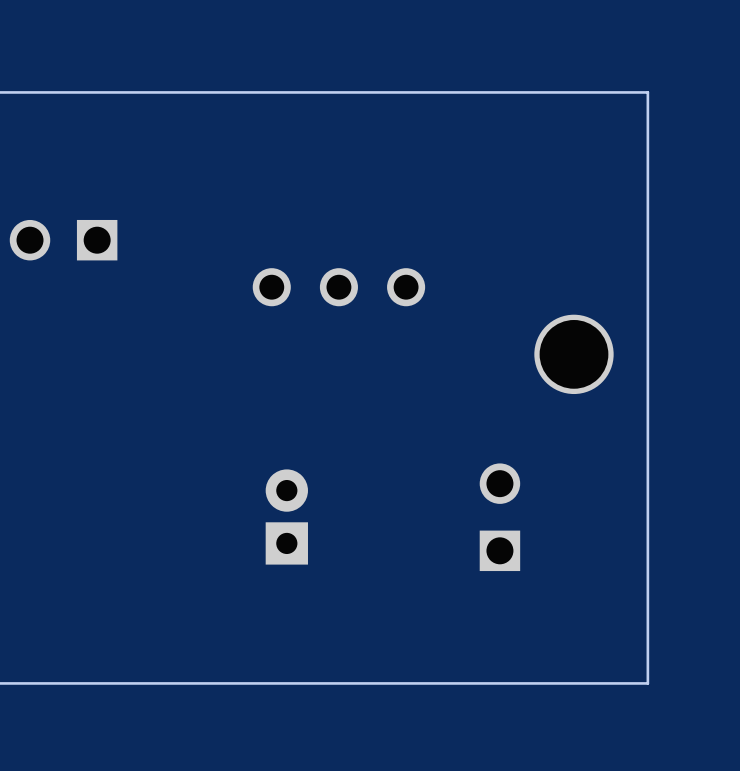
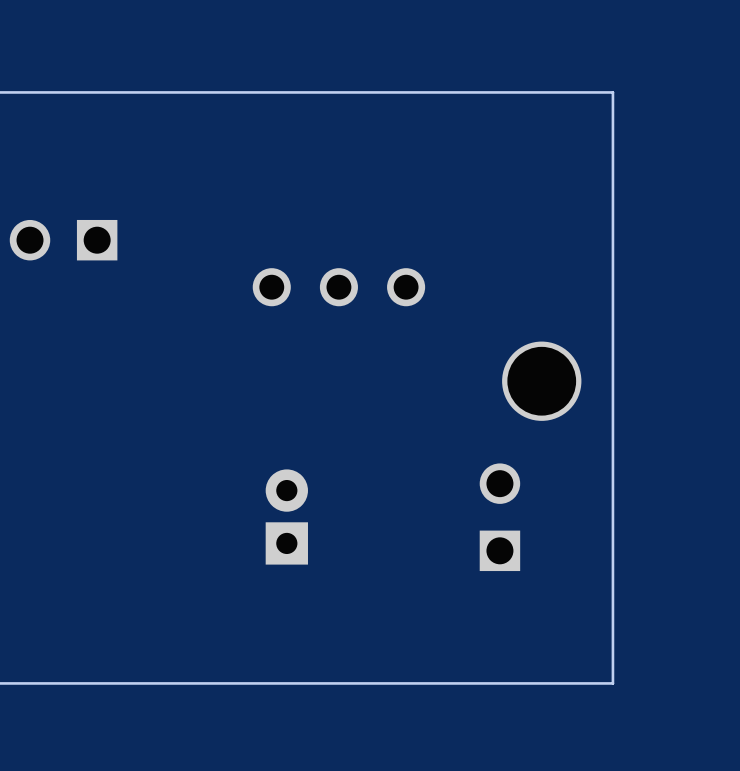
board edge: (612, 92) (647, 92) (647, 683) (612, 683) -> (612, 92) (612, 683)
part position: (573, 354) -> (541, 381)

